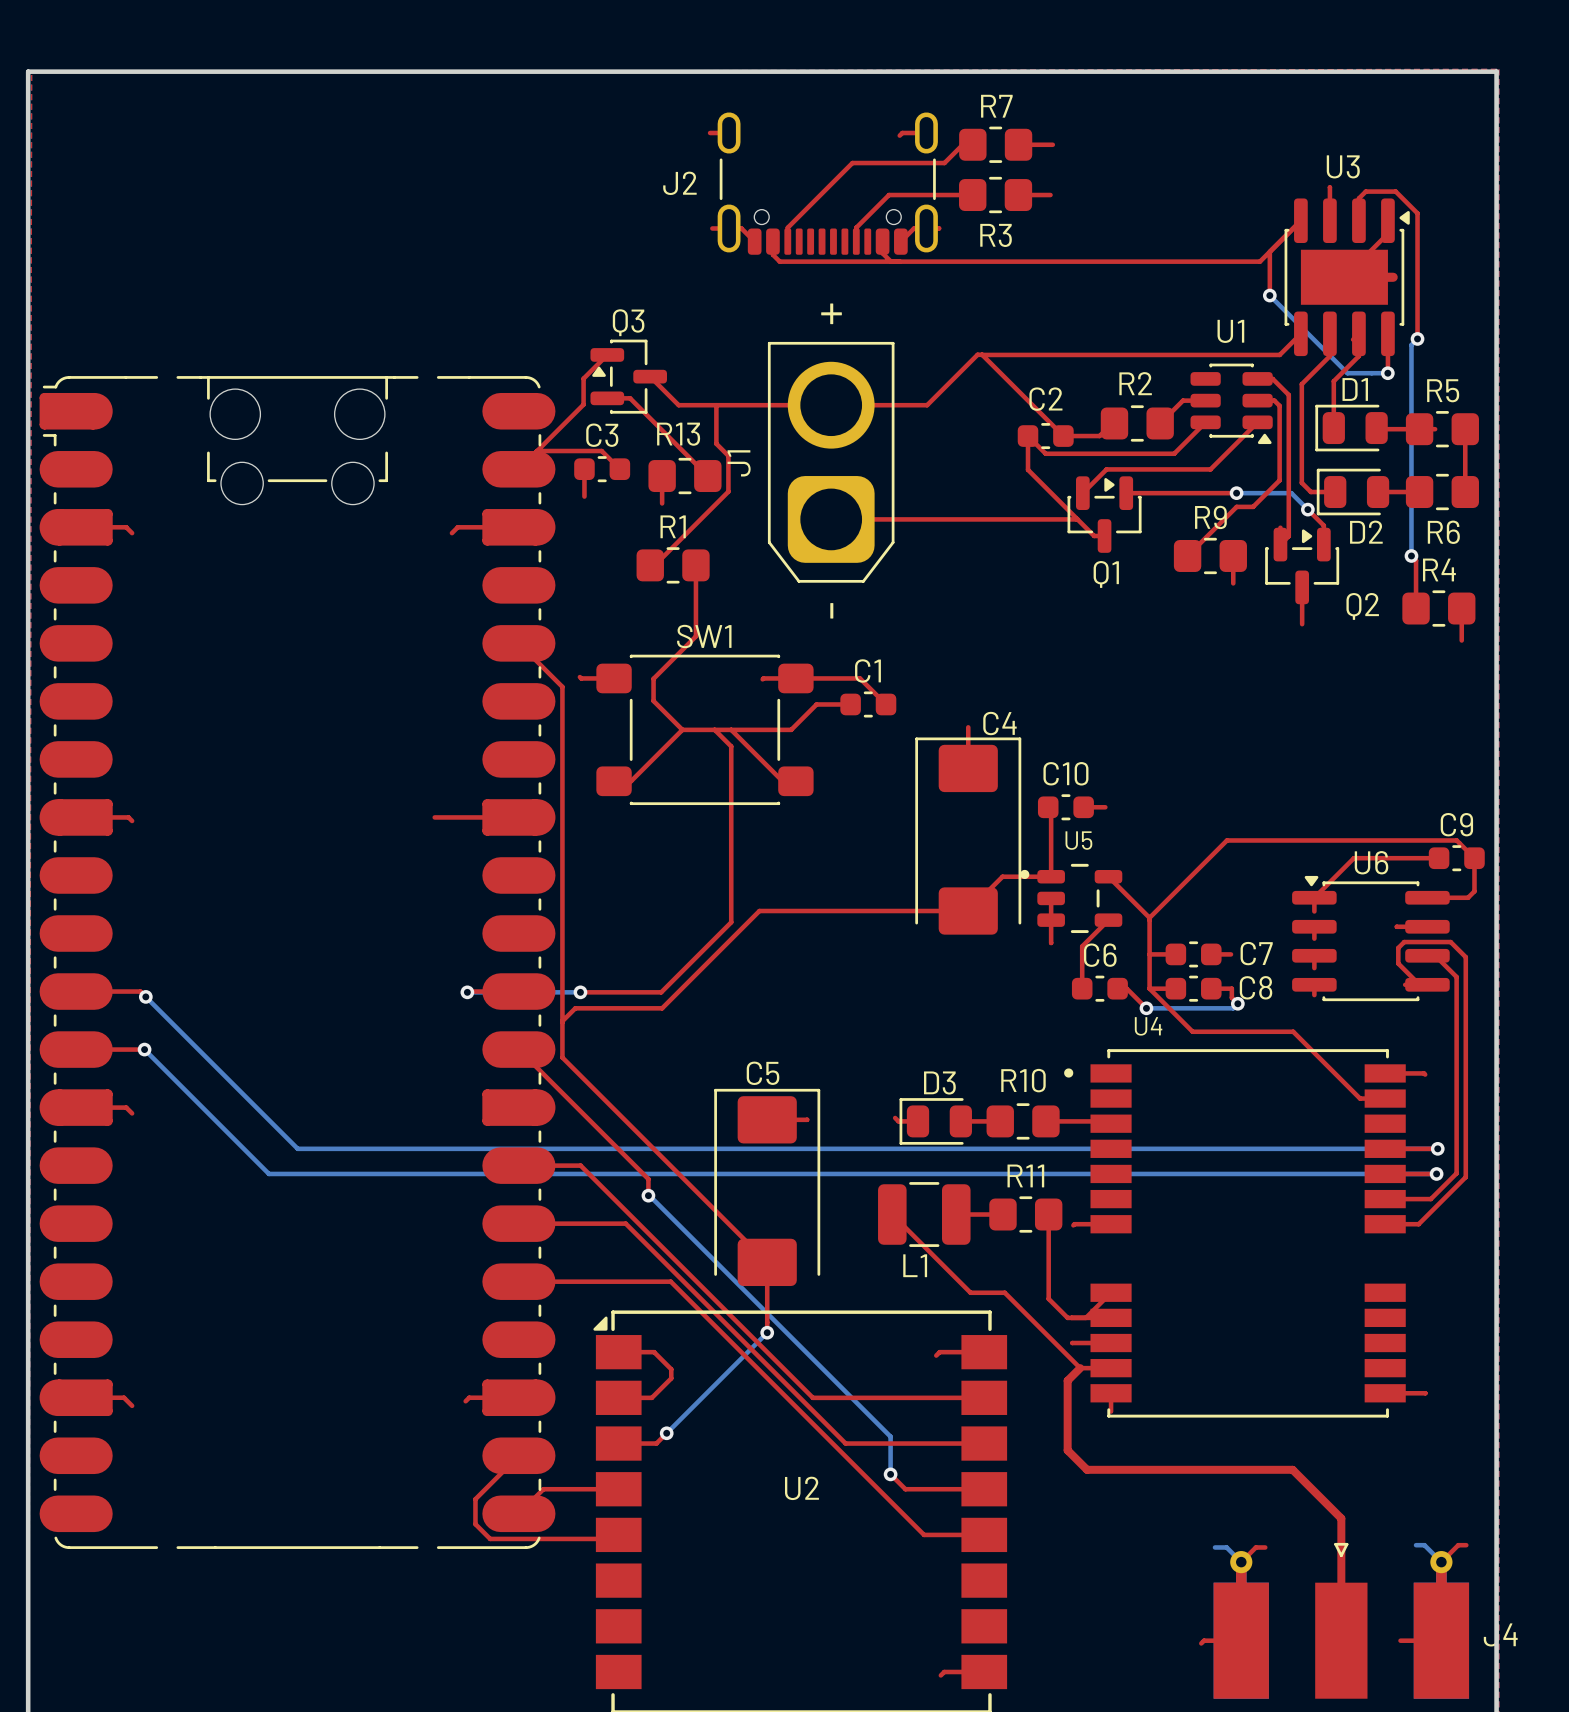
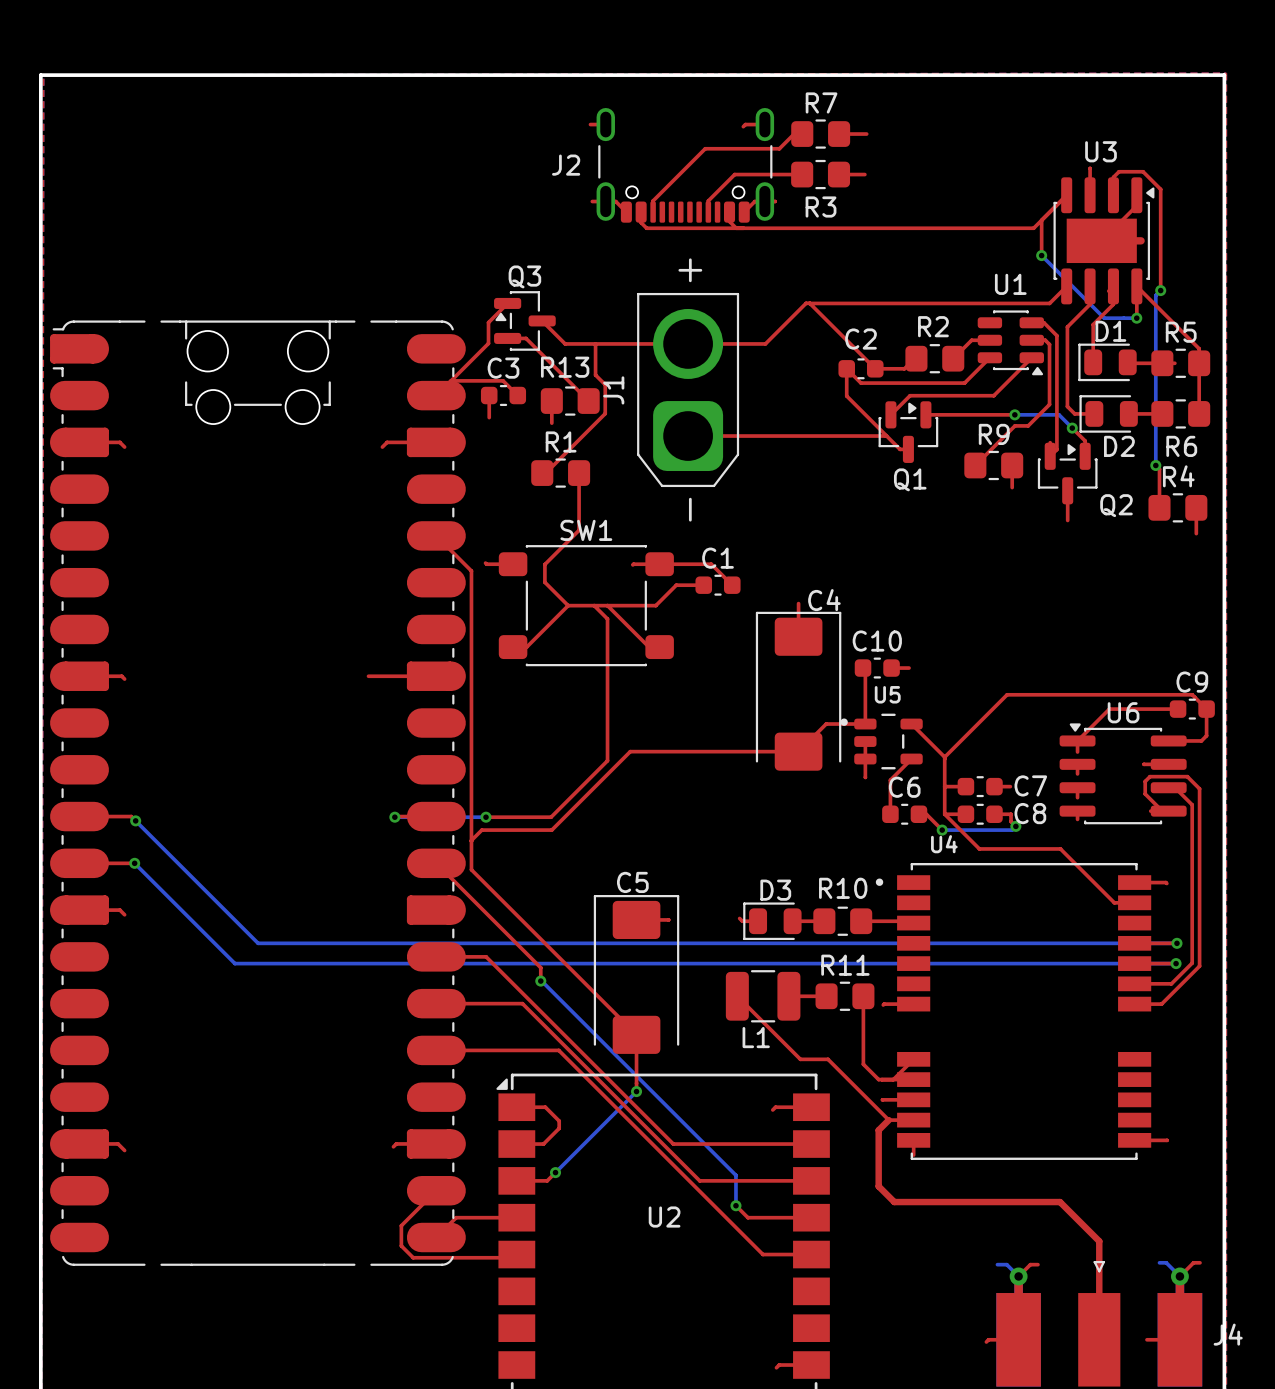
top track: none -> (1136, 286) (1199, 348) (1199, 363)

